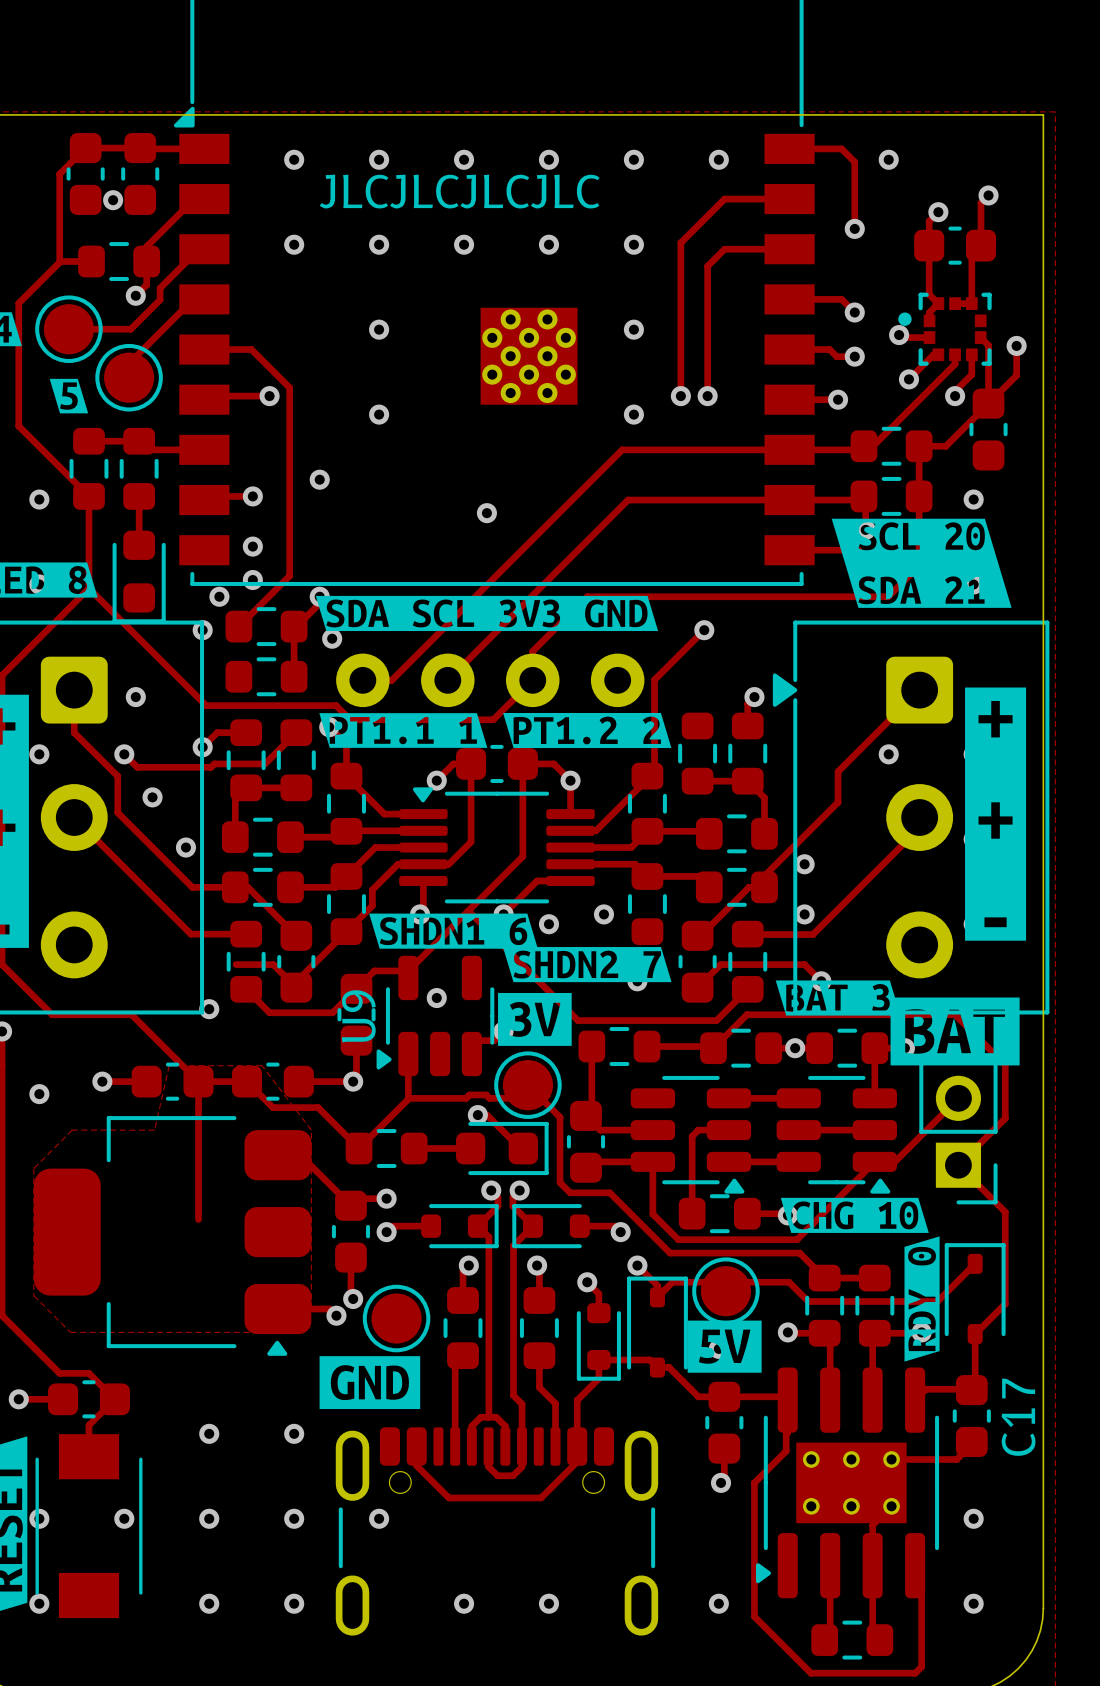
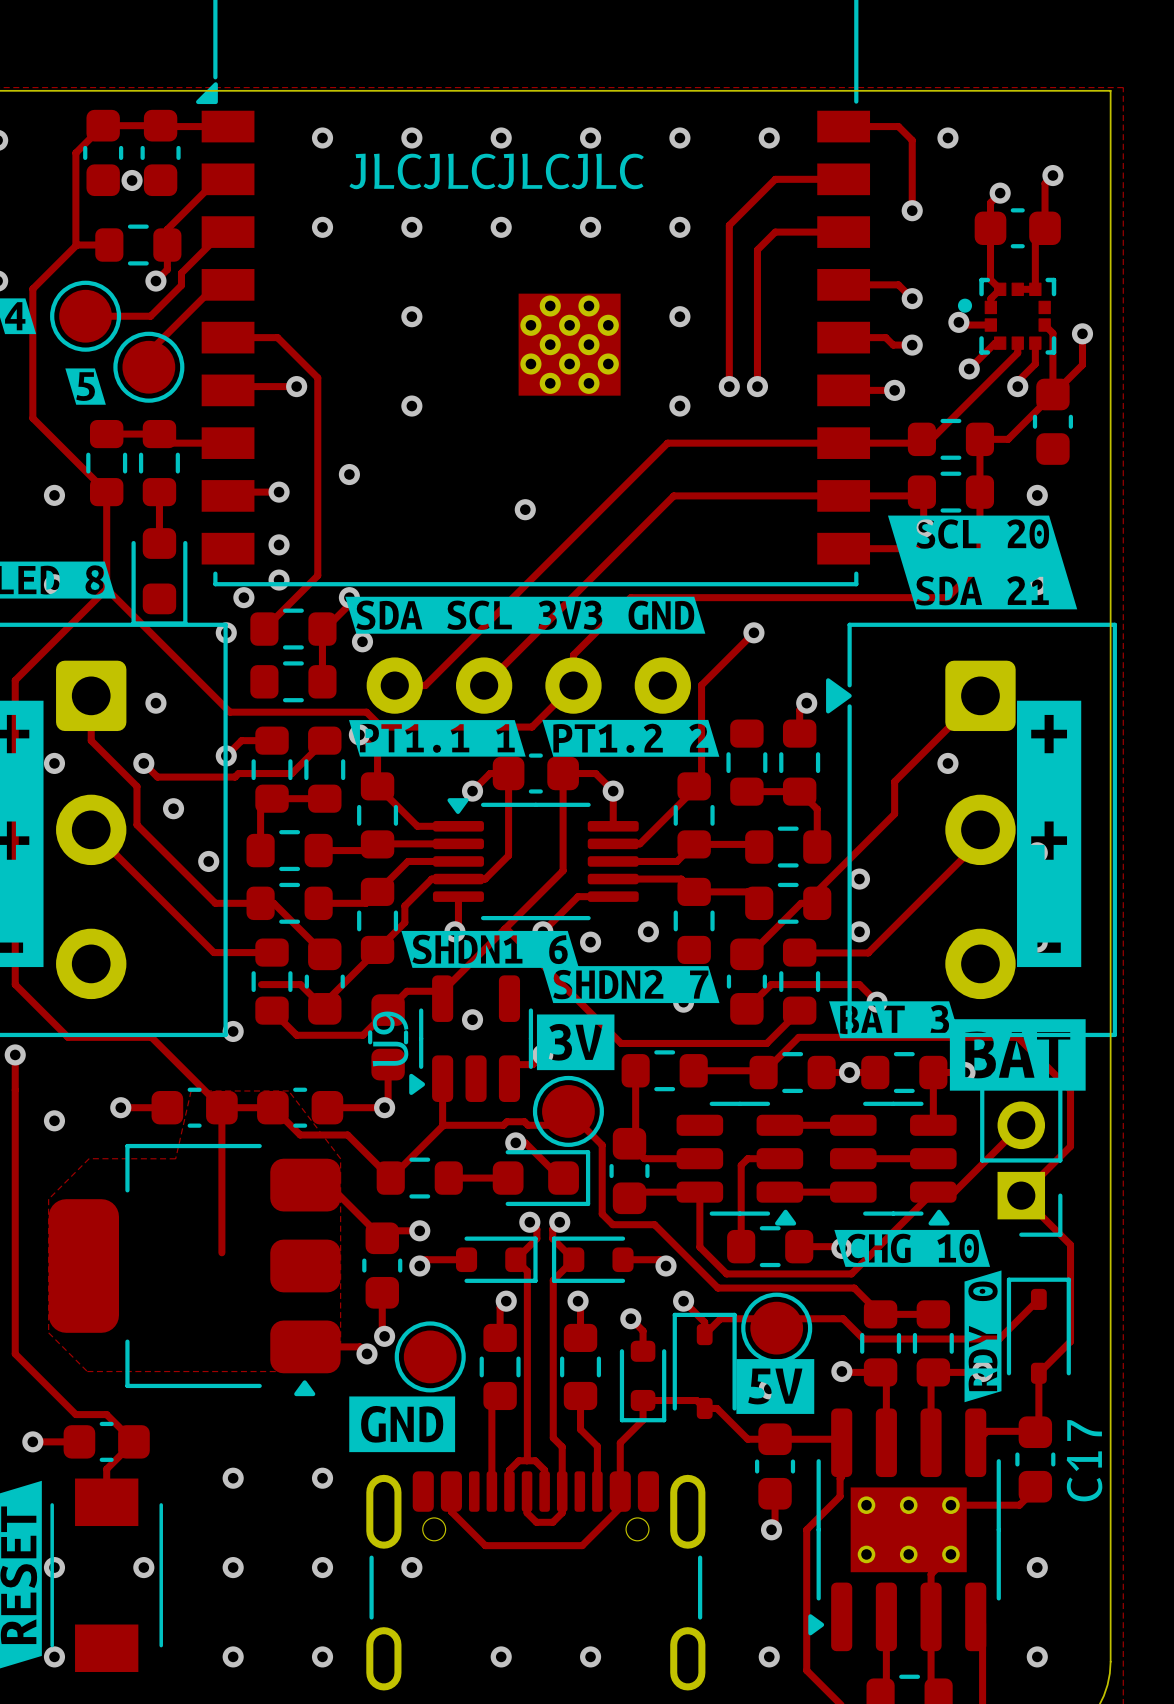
drawing position: (995, 814) -> (1049, 833)

